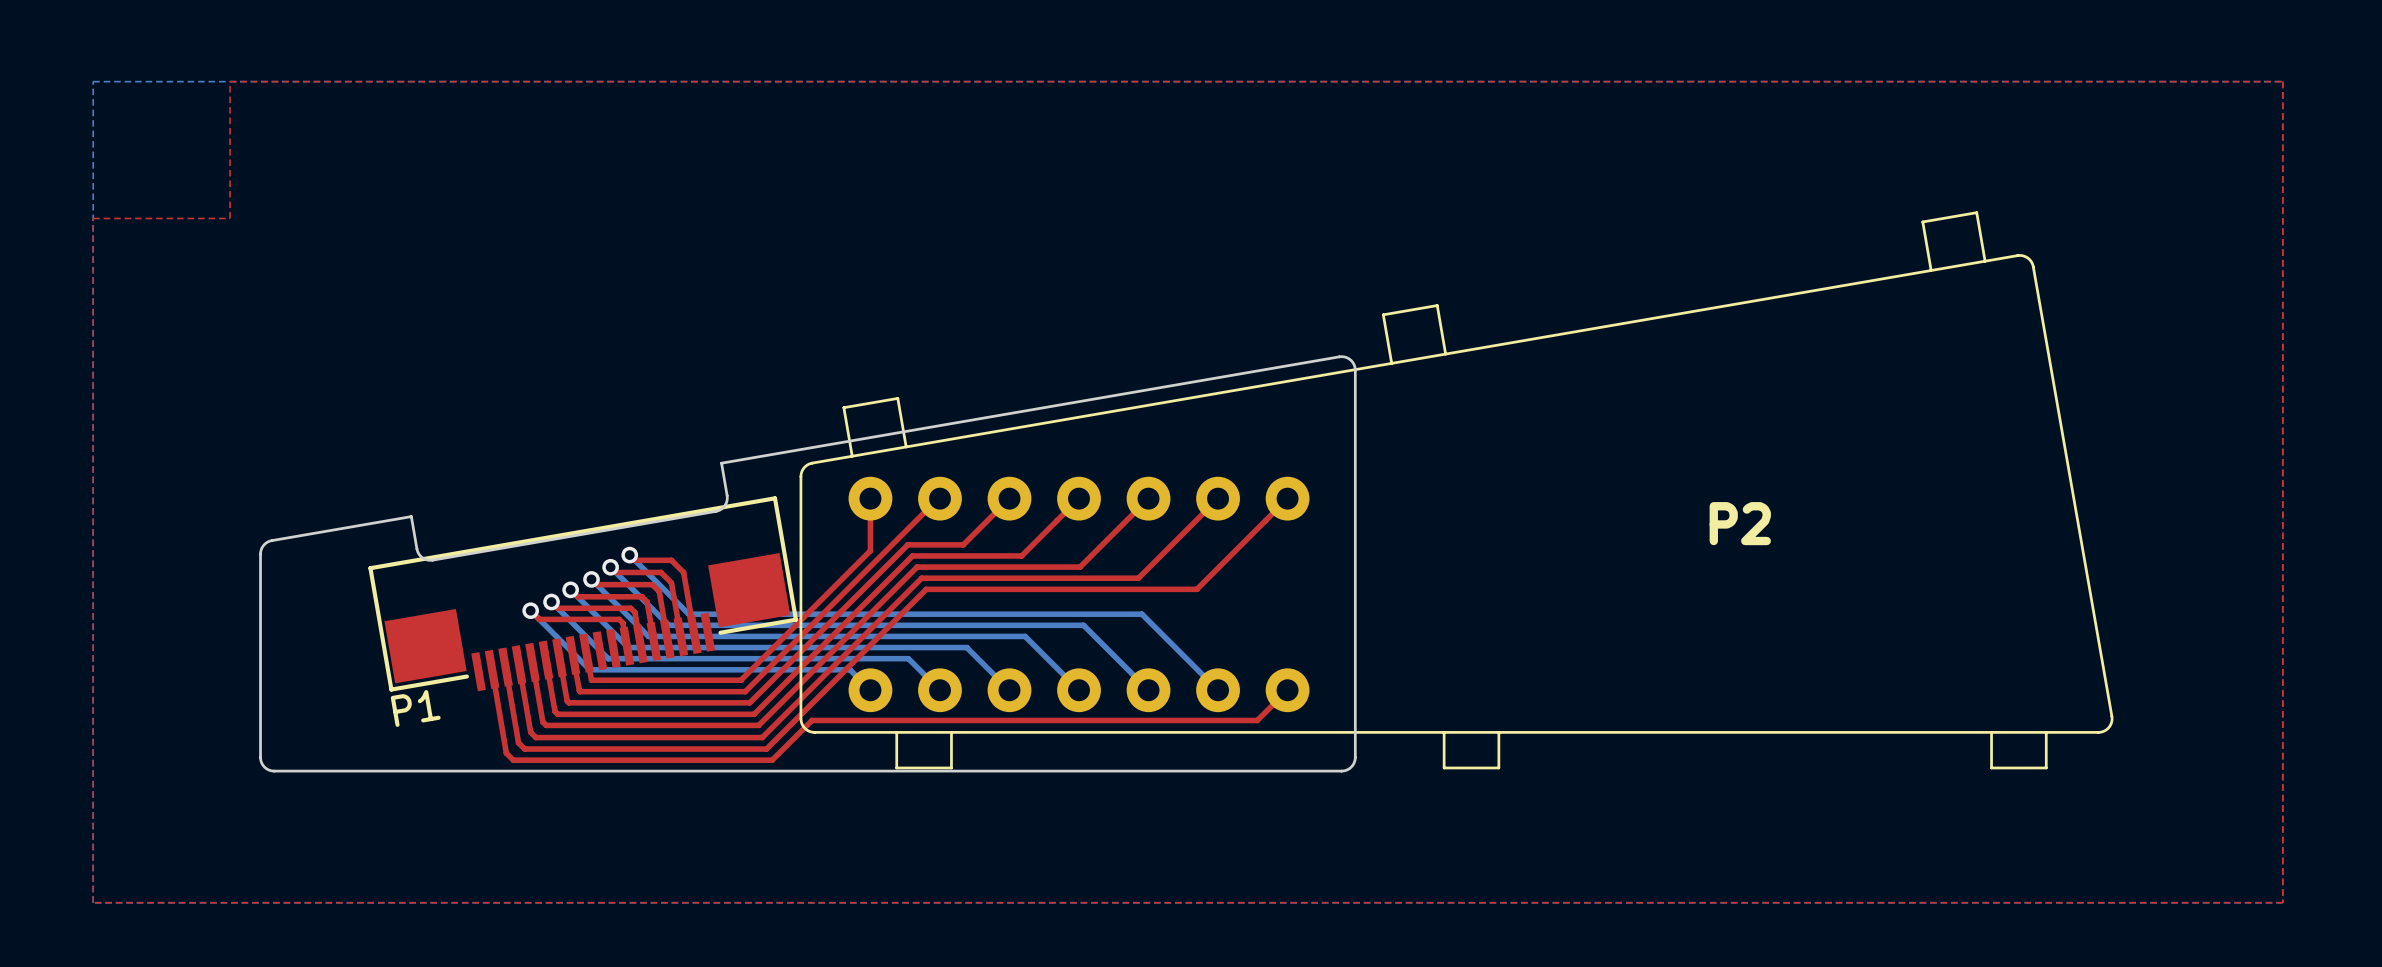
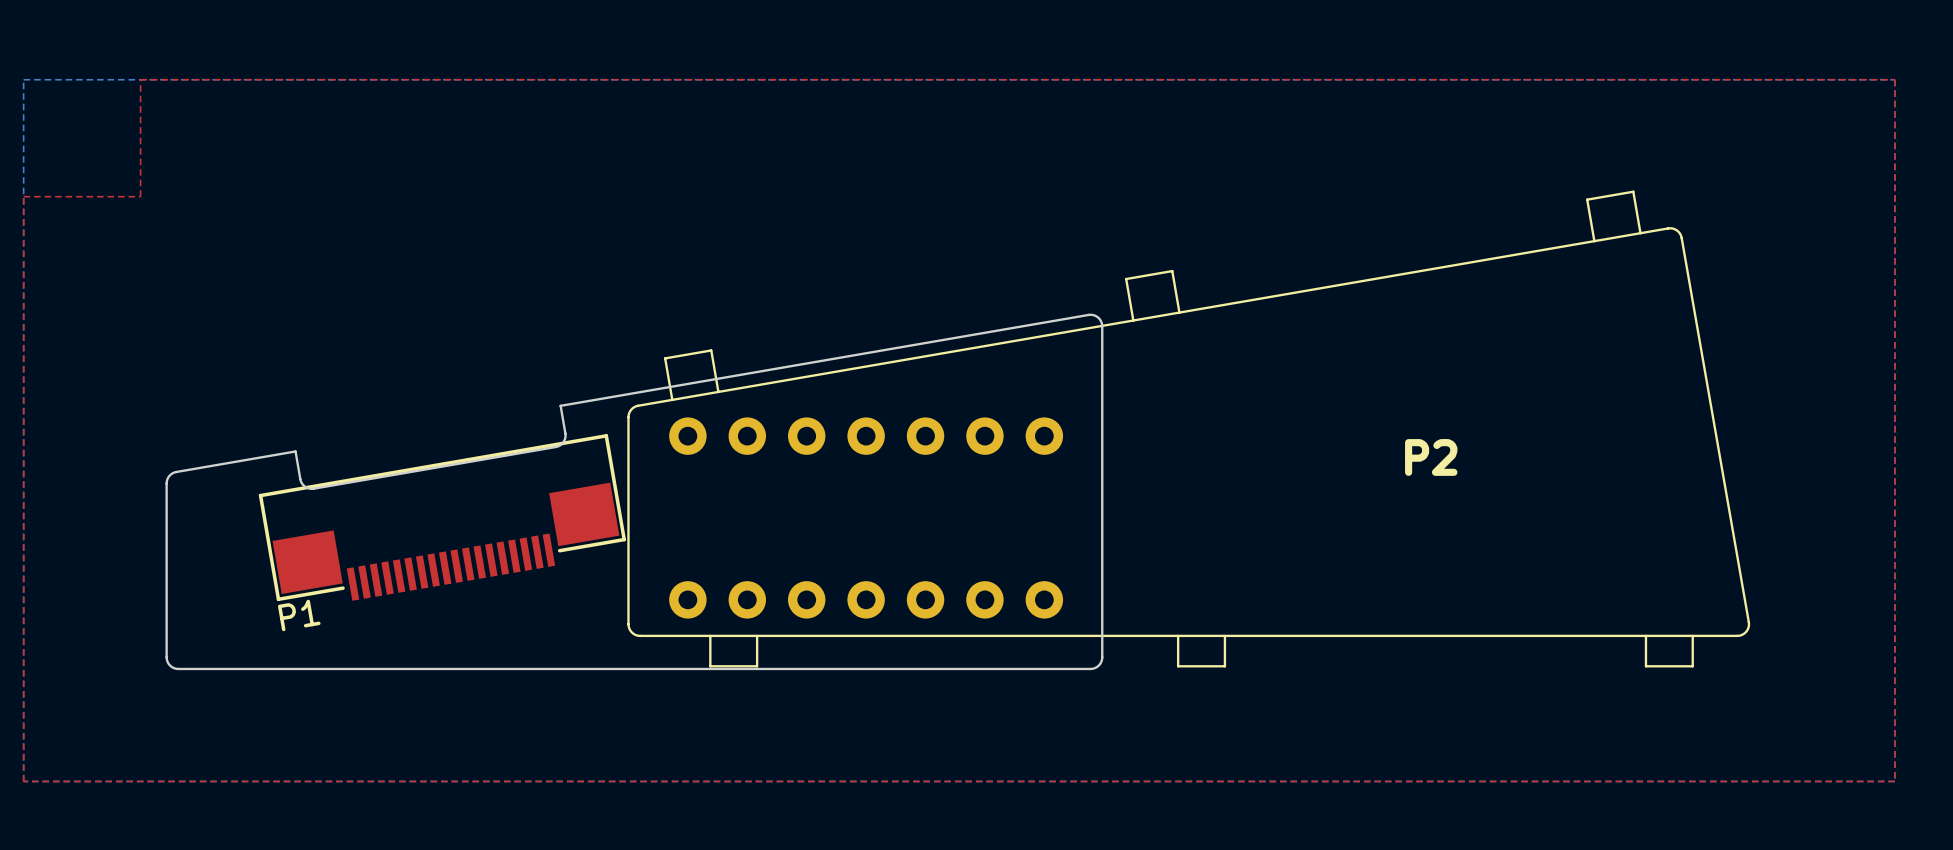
top track: (870, 498) (870, 550) (740, 680) (591, 680) (586, 653) -> none
top track: (939, 498) (745, 691) (580, 691) (572, 655) -> none
top track: (1009, 498) (963, 544) (907, 544) (749, 702) (568, 702) (559, 657) -> none
top track: (1079, 498) (1021, 555) (912, 555) (754, 714) (557, 714) (555, 711) (546, 660) -> none
top track: (1148, 498) (1080, 567) (917, 567) (758, 725) (546, 725) (542, 721) (532, 662) -> none
top track: (1218, 498) (1138, 578) (921, 578) (762, 737) (535, 737) (530, 732) (519, 664) -> none
top track: (1287, 498) (1196, 589) (926, 589) (766, 749) (524, 749) (518, 742) (505, 667) -> none
top track: (629, 555) (634, 560) (671, 560) (683, 572) (694, 634) -> none
bottom track: (629, 555) (688, 614) (1141, 614) (1218, 690) -> none
via: (629, 555) -> none
top track: (610, 567) (615, 572) (661, 572) (671, 582) (680, 636) -> none
bottom track: (610, 567) (668, 625) (1083, 625) (1148, 690) -> none
via: (610, 567) -> none
top track: (591, 579) (596, 584) (652, 584) (659, 591) (667, 639) -> none
bottom track: (591, 579) (648, 636) (1025, 636) (1079, 690) -> none
via: (591, 579) -> none
top track: (570, 589) (577, 596) (641, 596) (647, 602) (653, 641) -> none
bottom track: (570, 589) (628, 647) (966, 647) (1009, 690) -> none
via: (570, 589) -> none
top track: (551, 602) (557, 608) (630, 608) (634, 612) (640, 643) -> none
bottom track: (551, 602) (608, 658) (908, 658) (939, 690) -> none
via: (551, 602) -> none
top track: (530, 610) (539, 619) (619, 619) (622, 622) (626, 646) -> none
bottom track: (530, 610) (589, 669) (850, 669) (870, 690) -> none
via: (530, 610) -> none
top track: (492, 669) (506, 753) (513, 760) (772, 760) (811, 720) (1257, 720) (1287, 690) -> none

